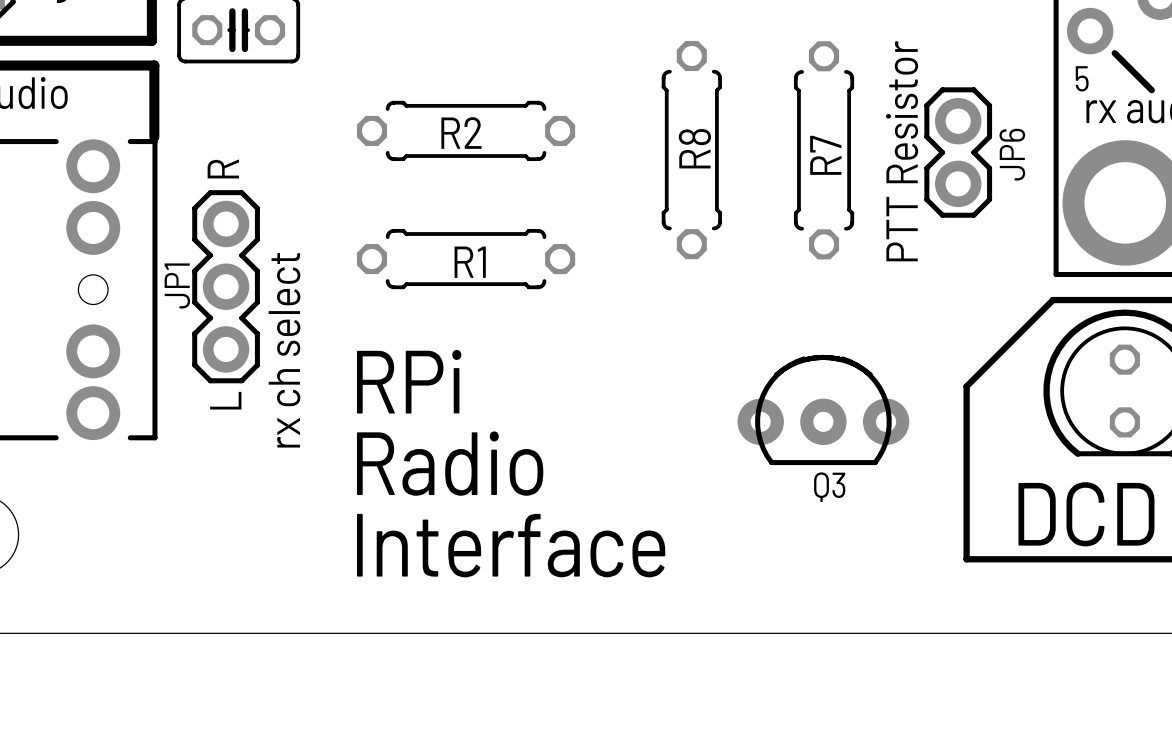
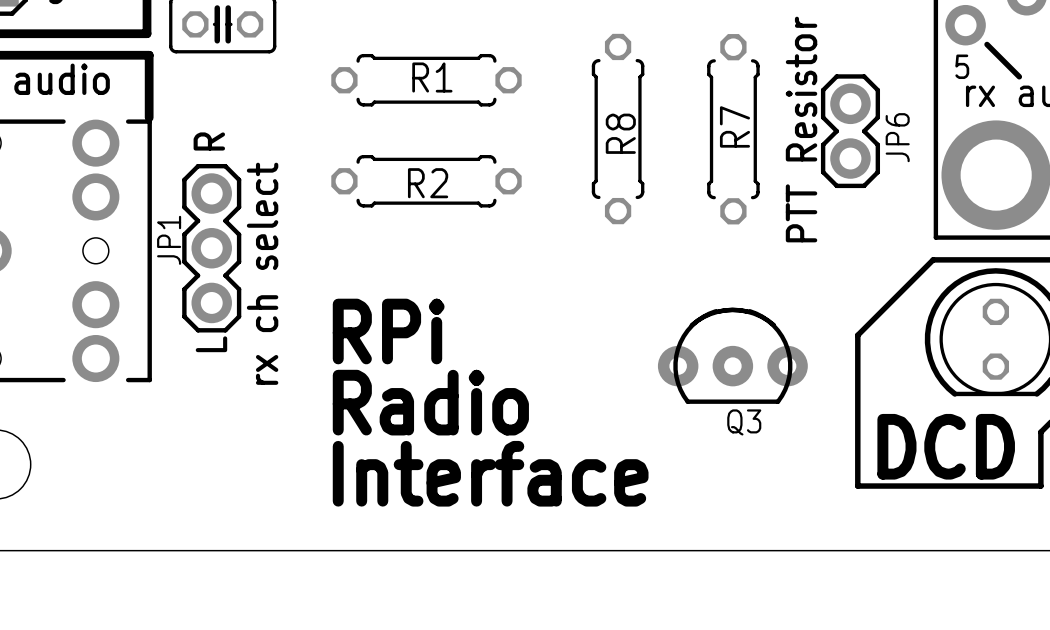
R2 position: (466, 130) -> (426, 181)
R1 position: (466, 259) -> (426, 80)
R1 name position: R1 (470, 262) -> R1 (432, 77)

